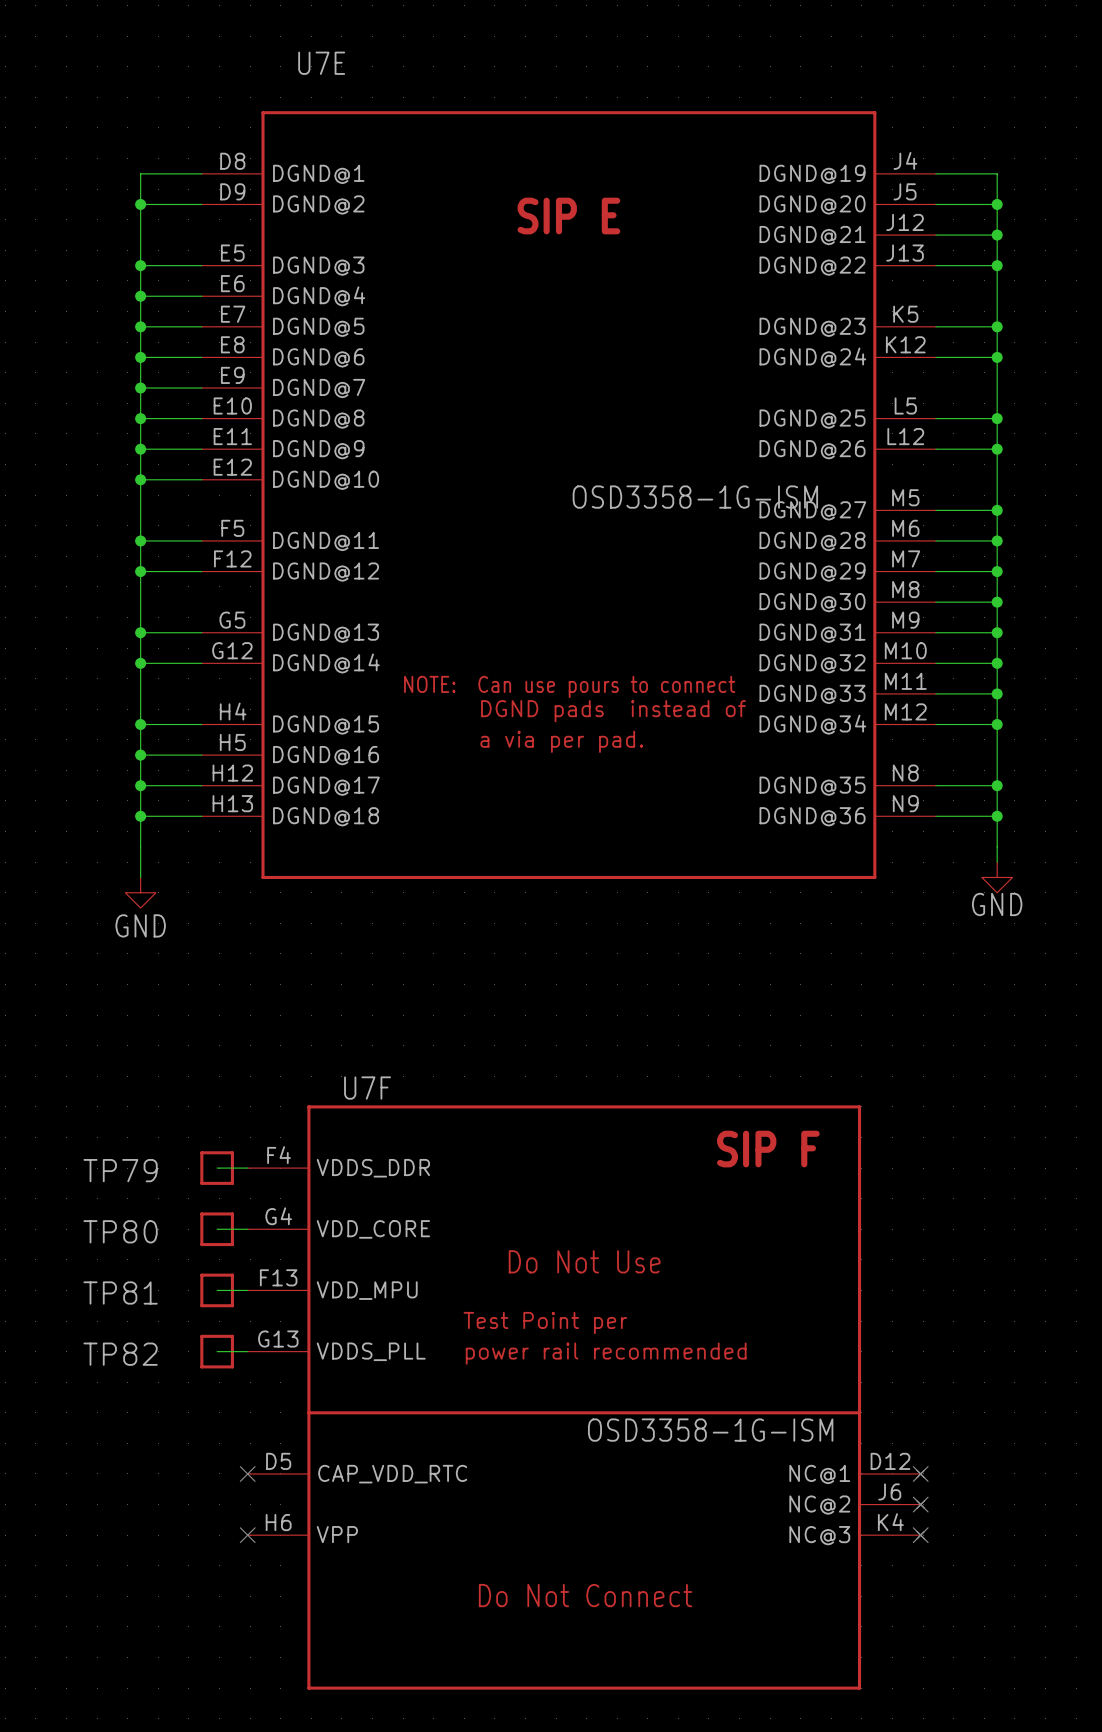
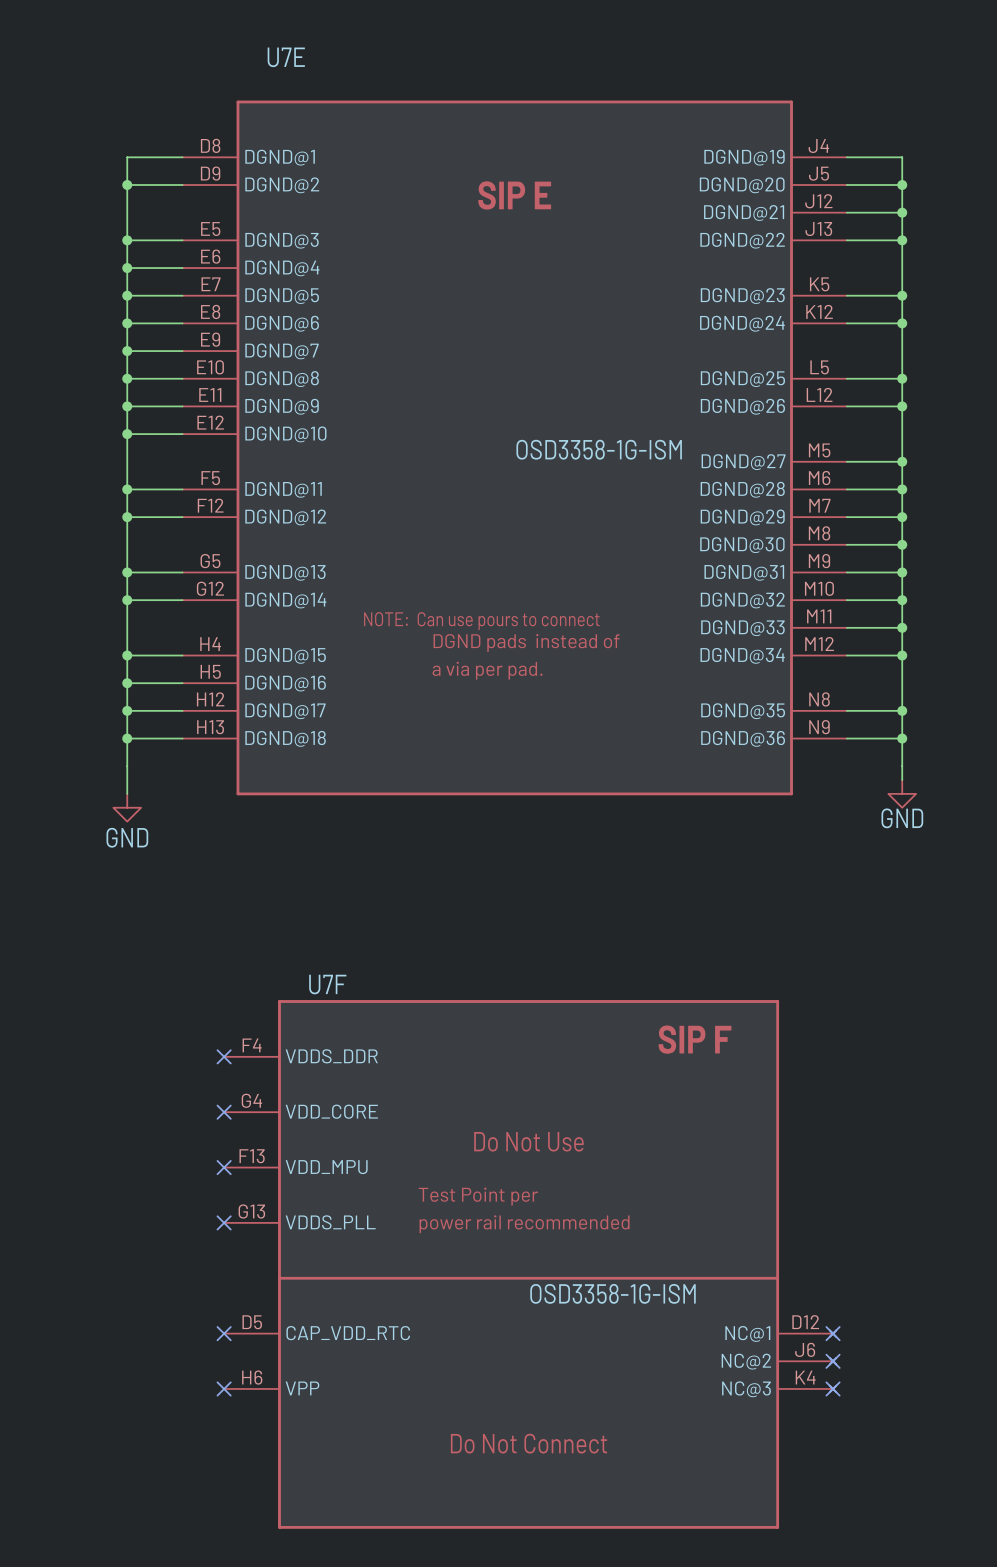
wire: (217, 1168) (247, 1168) -> none
TP79: (217, 1168) -> none
no-connect mark: none -> (224, 1056)
wire: (217, 1229) (247, 1229) -> none
TP80: (217, 1229) -> none
no-connect mark: none -> (224, 1112)
wire: (217, 1290) (247, 1290) -> none
TP81: (217, 1290) -> none
no-connect mark: none -> (224, 1167)
wire: (217, 1351) (247, 1351) -> none
TP82: (217, 1351) -> none
no-connect mark: none -> (224, 1222)

